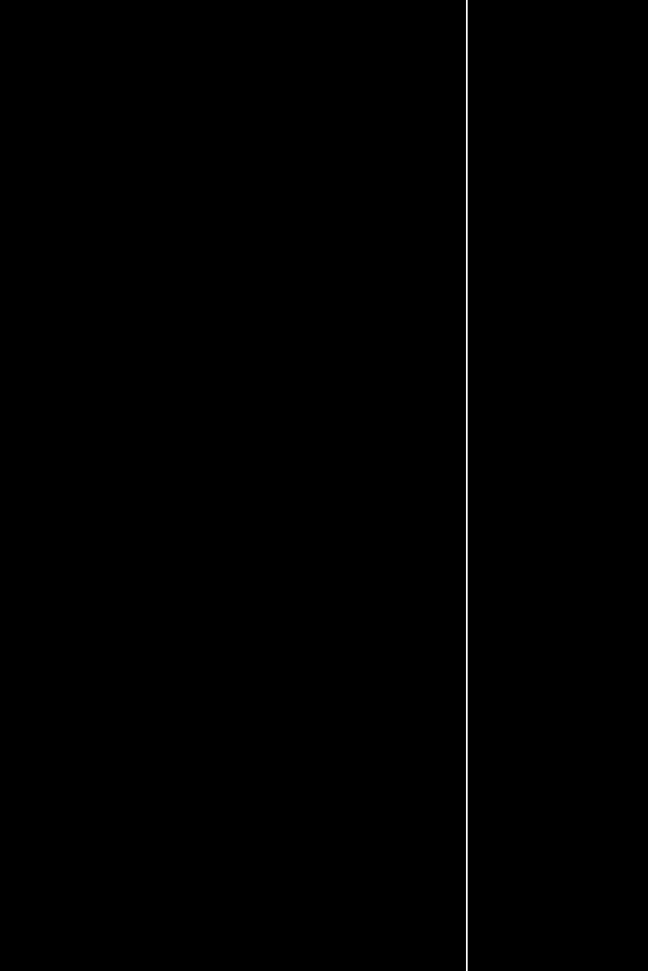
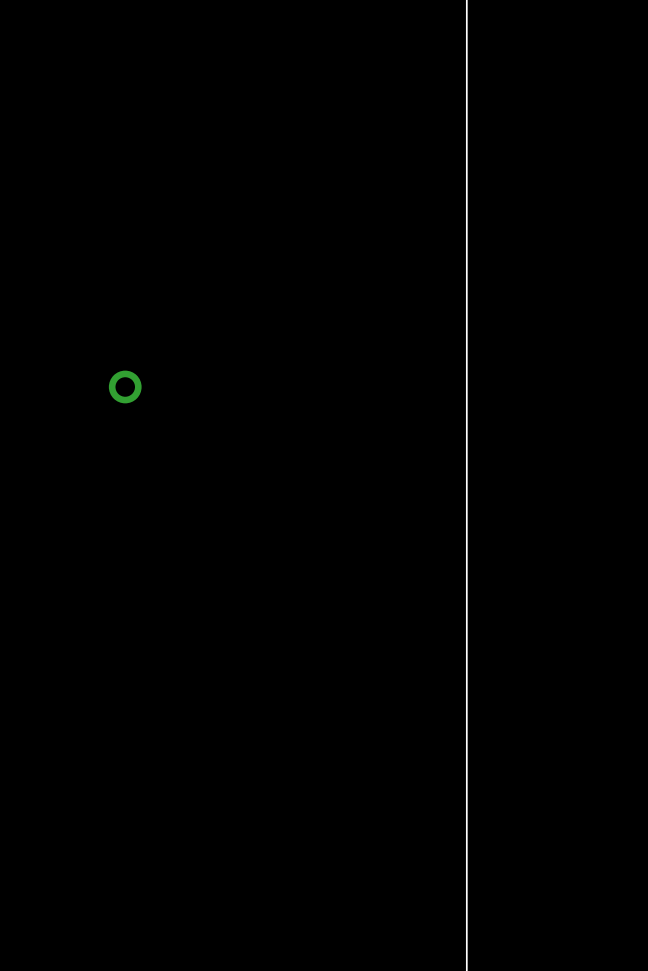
via: none -> (125, 386)

